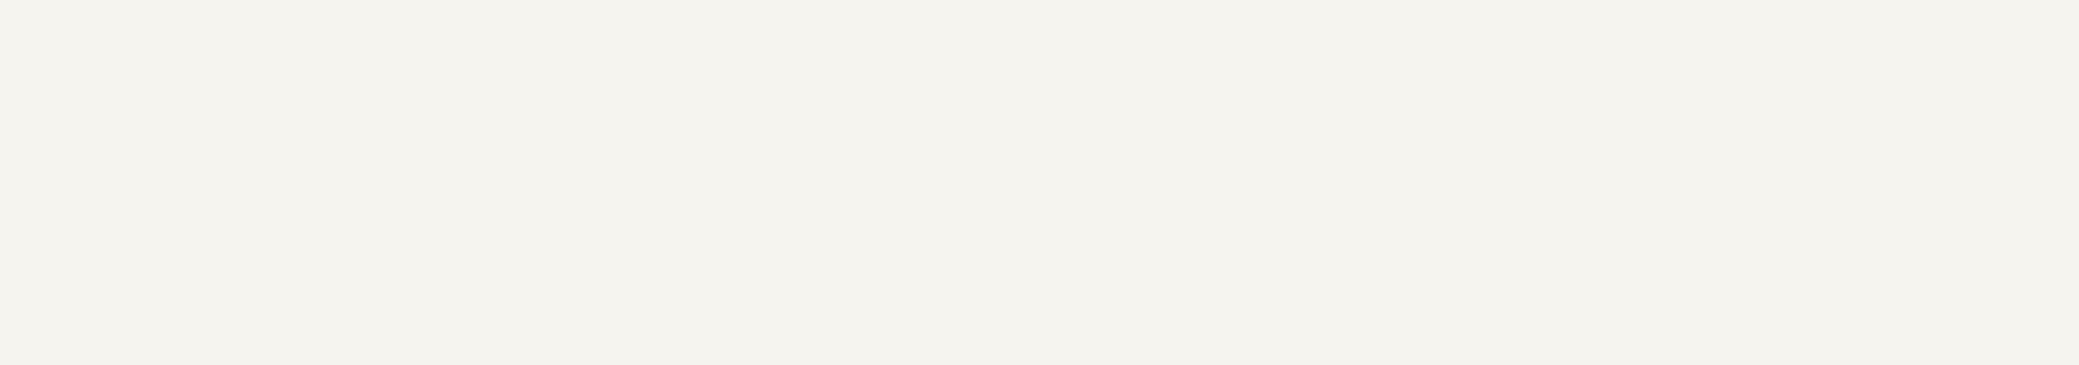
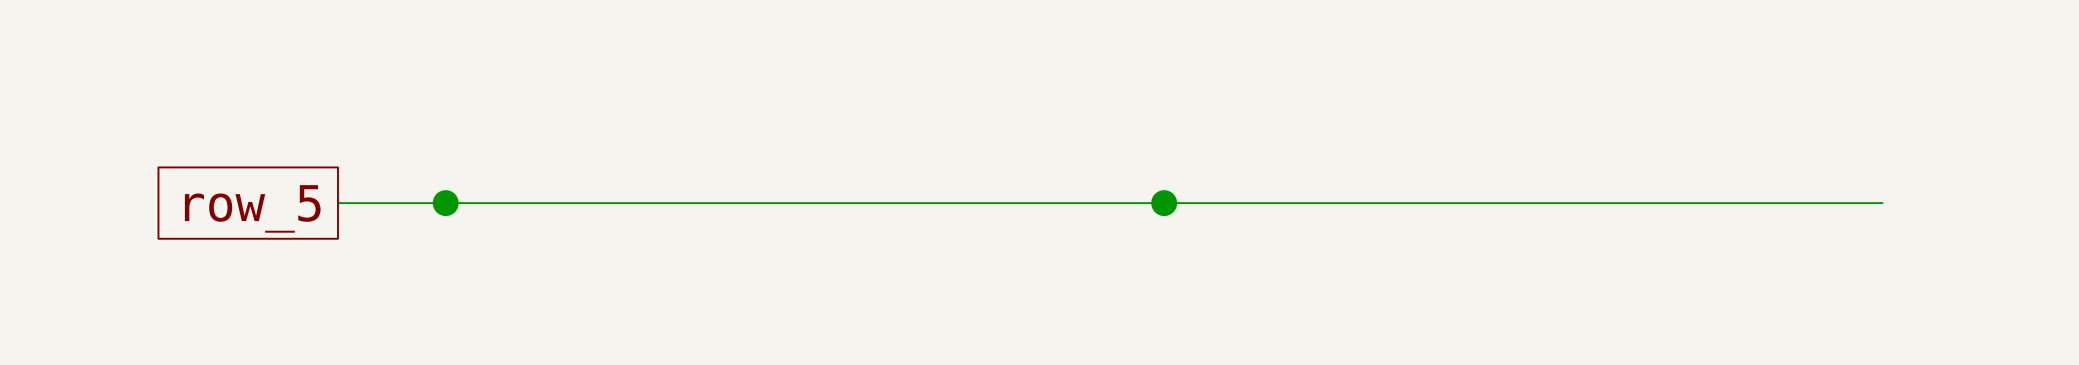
wire: none -> (337, 203) (1882, 203)
junction: none -> (445, 203)
junction: none -> (1164, 203)
global label: none -> row_5 (252, 208)

